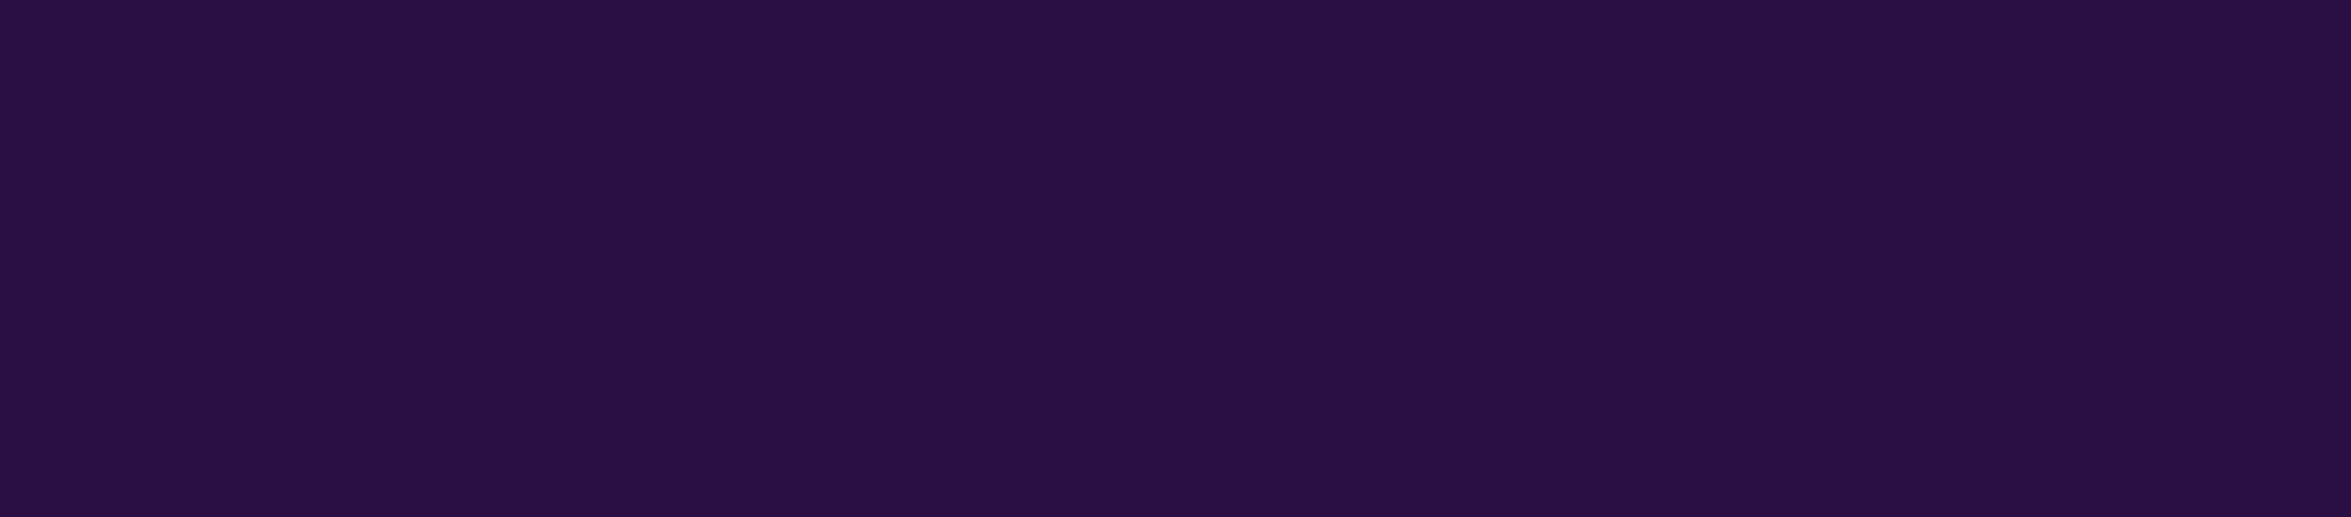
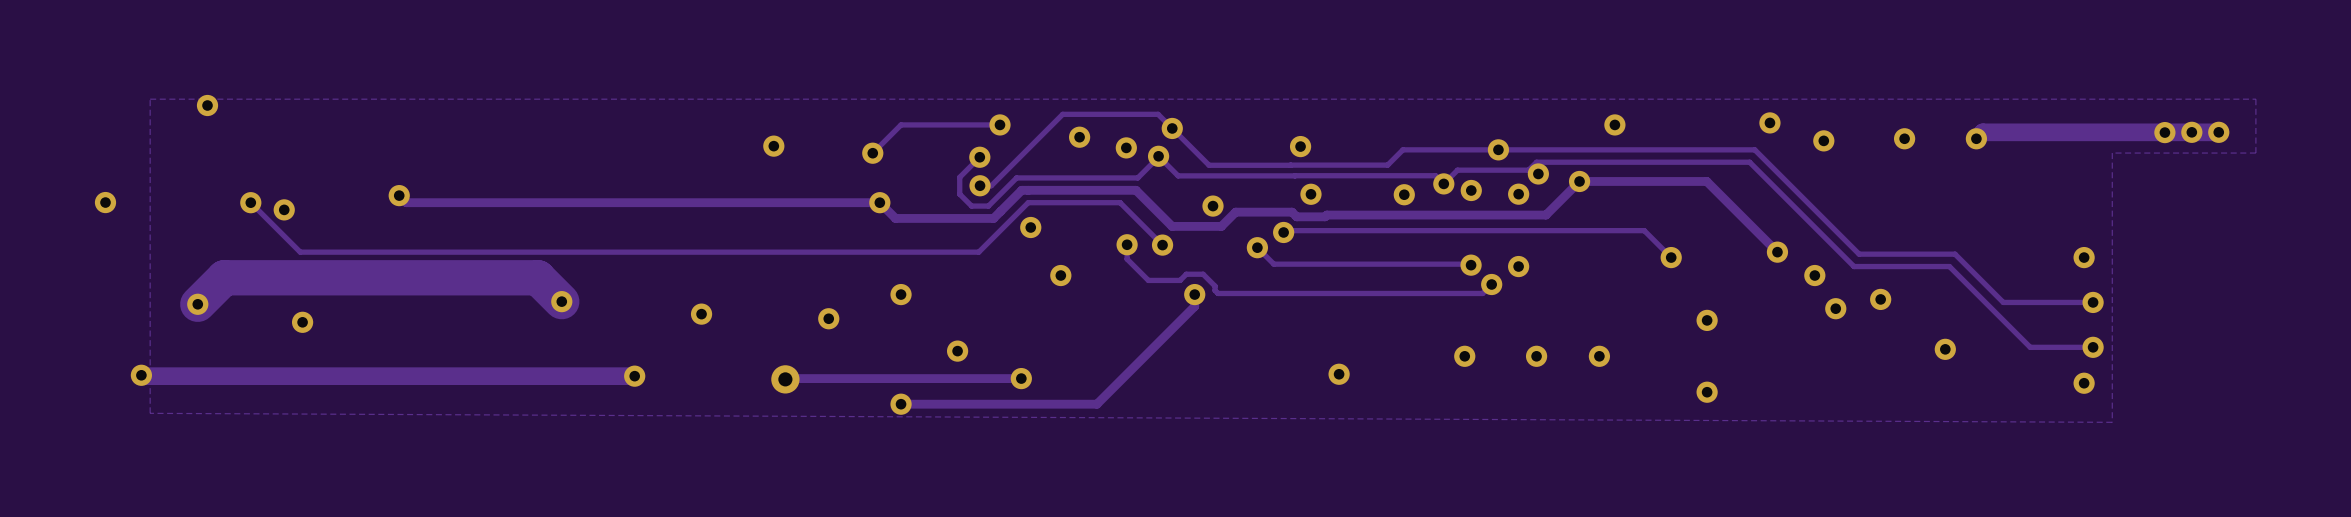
zone outline: none -> (2255, 99) (2255, 153) (2112, 153) (2112, 422) (150, 413) (150, 99) (2255, 99)
via: none -> (207, 105)
via: none -> (1769, 122)
track: none -> (999, 124) (901, 124) (872, 153)
via: none -> (999, 124)
via: none -> (1614, 124)
via: none -> (1172, 128)
via: none -> (2164, 132)
via: none -> (2191, 132)
track: none -> (2218, 132) (1982, 132) (1976, 138)
via: none -> (2218, 132)
via: none -> (1079, 137)
via: none -> (1904, 138)
via: none -> (1976, 138)
via: none -> (1823, 140)
via: none -> (773, 146)
via: none -> (1300, 146)
via: none -> (1126, 147)
via: none -> (1498, 149)
via: none -> (872, 153)
via: none -> (1158, 156)
track: none -> (979, 157) (959, 177) (959, 194) (971, 206) (988, 206) (1016, 177) (1137, 177) (1158, 156) (1178, 175) (1435, 175) (1443, 183) (1457, 170) (1528, 170) (1536, 162) (1749, 162) (1854, 266) (1949, 266) (2030, 347) (2093, 347)
via: none -> (979, 157)
via: none -> (1538, 173)
via: none -> (1579, 181)
via: none -> (1443, 183)
track: none -> (980, 185) (991, 185) (1062, 114) (1158, 114) (1209, 165) (1387, 165) (1402, 149) (1754, 149) (1859, 254) (1955, 254) (2003, 302) (2093, 302)
via: none -> (980, 185)
via: none -> (1471, 190)
via: none -> (1310, 194)
via: none -> (1404, 194)
via: none -> (1518, 194)
track: none -> (399, 195) (406, 202) (879, 202) (895, 218) (993, 218) (1021, 190) (1136, 190) (1172, 226) (1221, 226) (1235, 212) (1292, 212) (1296, 216) (1325, 216) (1326, 215) (1545, 215) (1579, 181) (1706, 181) (1777, 252)
via: none -> (399, 195)
via: none -> (105, 202)
track: none -> (250, 202) (300, 252) (978, 252) (1028, 202) (1120, 202) (1162, 245)
via: none -> (250, 202)
via: none -> (879, 202)
via: none -> (1213, 206)
via: none -> (284, 209)
via: none -> (1030, 227)
track: none -> (1283, 232) (1285, 230) (1644, 230) (1671, 257)
via: none -> (1283, 232)
track: none -> (1127, 244) (1127, 259) (1148, 280) (1180, 280) (1186, 274) (1203, 274) (1215, 286) (1215, 290) (1218, 293) (1482, 293) (1491, 284)
via: none -> (1127, 244)
via: none -> (1162, 245)
track: none -> (1257, 247) (1273, 264) (1471, 265)
via: none -> (1257, 247)
via: none -> (1777, 252)
via: none -> (1671, 257)
via: none -> (2084, 257)
via: none -> (1471, 265)
via: none -> (1518, 266)
via: none -> (1060, 275)
via: none -> (1814, 275)
via: none -> (1491, 284)
via: none -> (901, 294)
track: none -> (1194, 294) (1194, 306) (1096, 404) (901, 404)
via: none -> (1194, 294)
via: none -> (1880, 299)
track: none -> (561, 301) (537, 277) (224, 277) (197, 304)
via: none -> (561, 301)
via: none -> (2093, 302)
via: none -> (197, 304)
via: none -> (1835, 308)
via: none -> (701, 314)
via: none -> (828, 318)
via: none -> (1707, 320)
via: none -> (302, 322)
via: none -> (2093, 347)
via: none -> (1945, 349)
via: none -> (957, 351)
via: none -> (1464, 356)
via: none -> (1536, 356)
via: none -> (1599, 356)
via: none -> (1339, 374)
track: none -> (141, 375) (634, 376)
via: none -> (141, 375)
via: none -> (634, 376)
track: none -> (1021, 378) (785, 379)
via: none -> (1021, 378)
via: none -> (785, 379)
via: none -> (2084, 383)
via: none -> (1707, 392)
via: none -> (901, 404)

